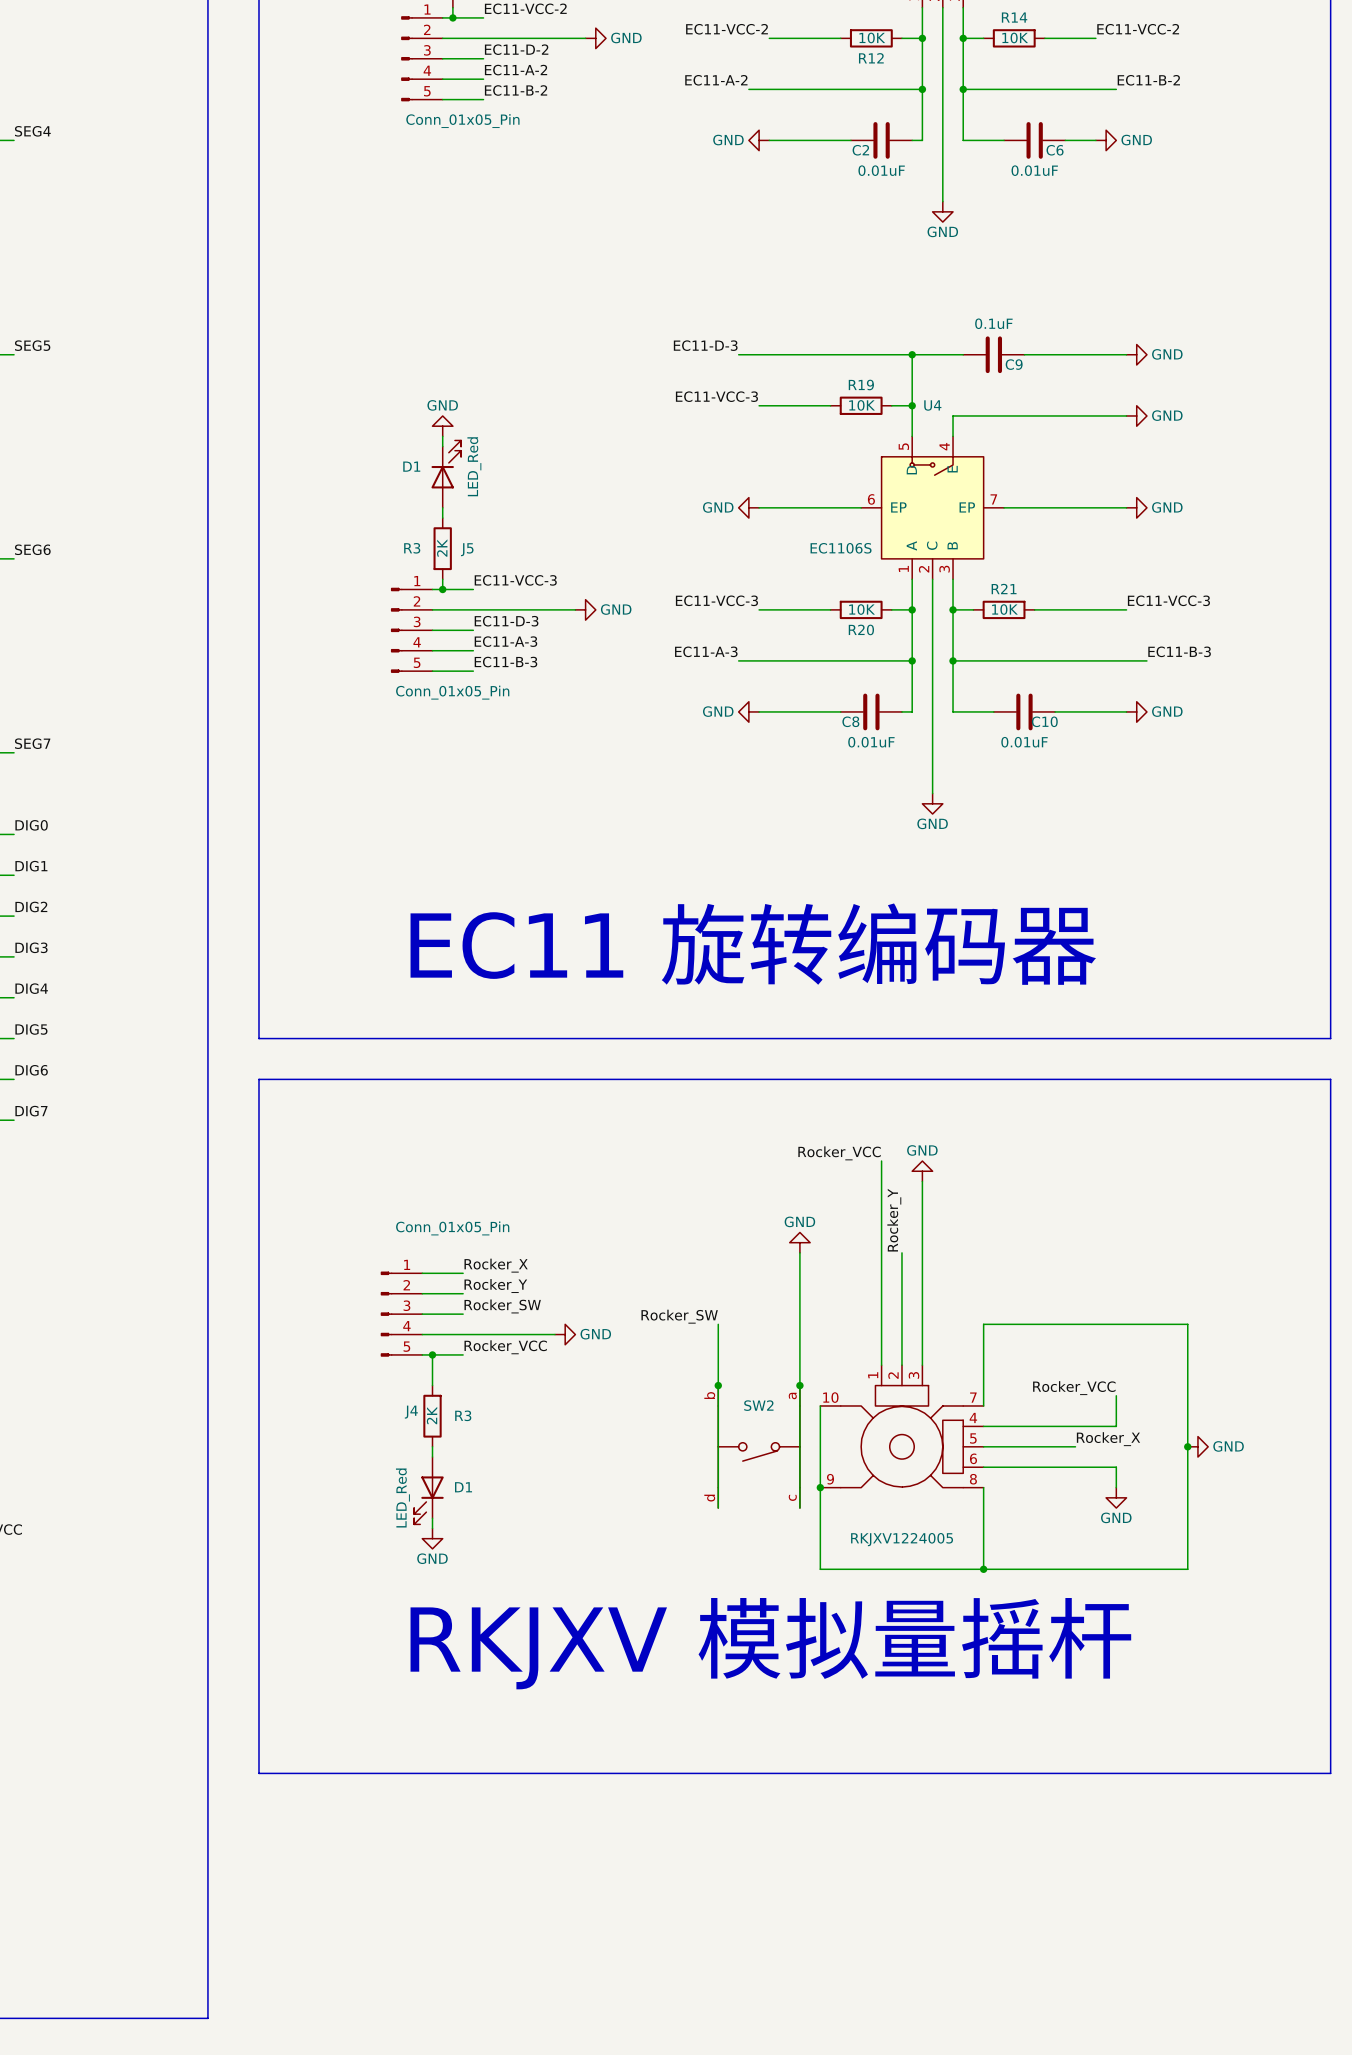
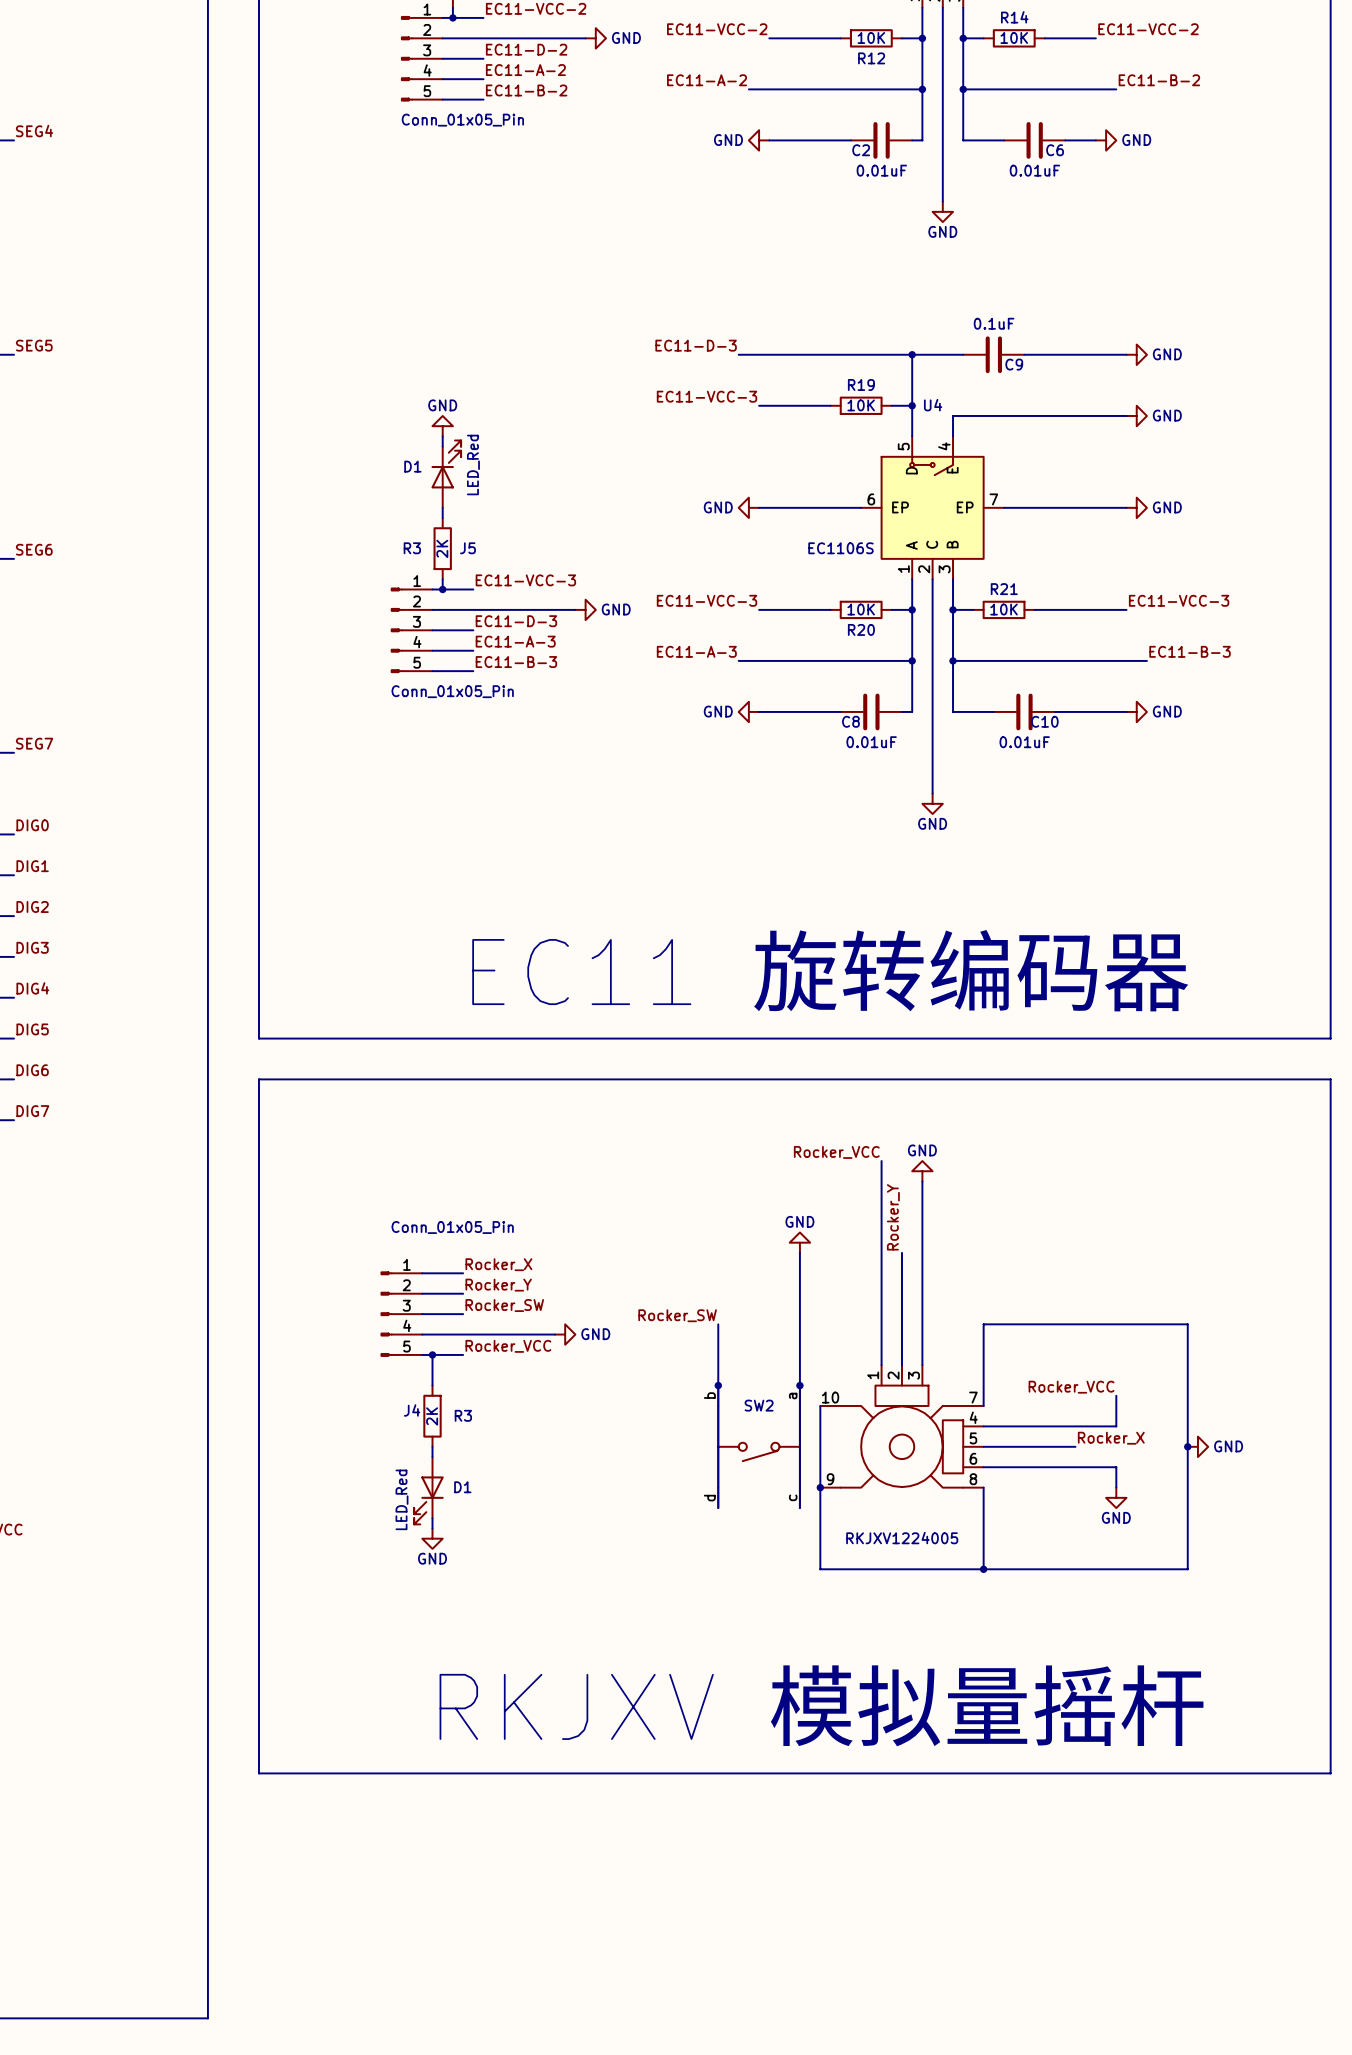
text position: EC11 旋转编码器 (753, 944) -> EC11 旋转编码器 (830, 970)
text position: RKJXV 模拟量摇杆 (770, 1643) -> RKJXV 模拟量摇杆 (821, 1705)

